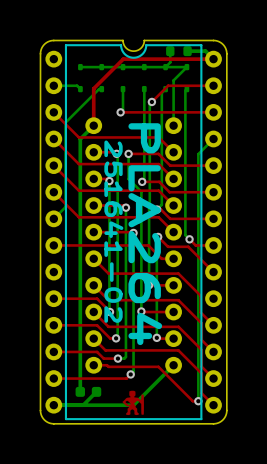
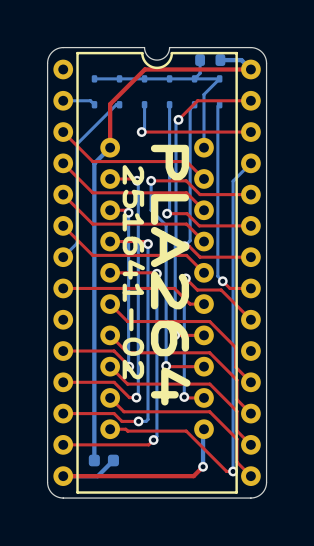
bottom track: (172, 366) (133, 405) (83, 405) -> (203, 430) (203, 466)
drawing: [122, 390, 144, 416] -> none
top track: none -> (203, 466) (193, 476) (63, 476)
via: none -> (203, 466)

